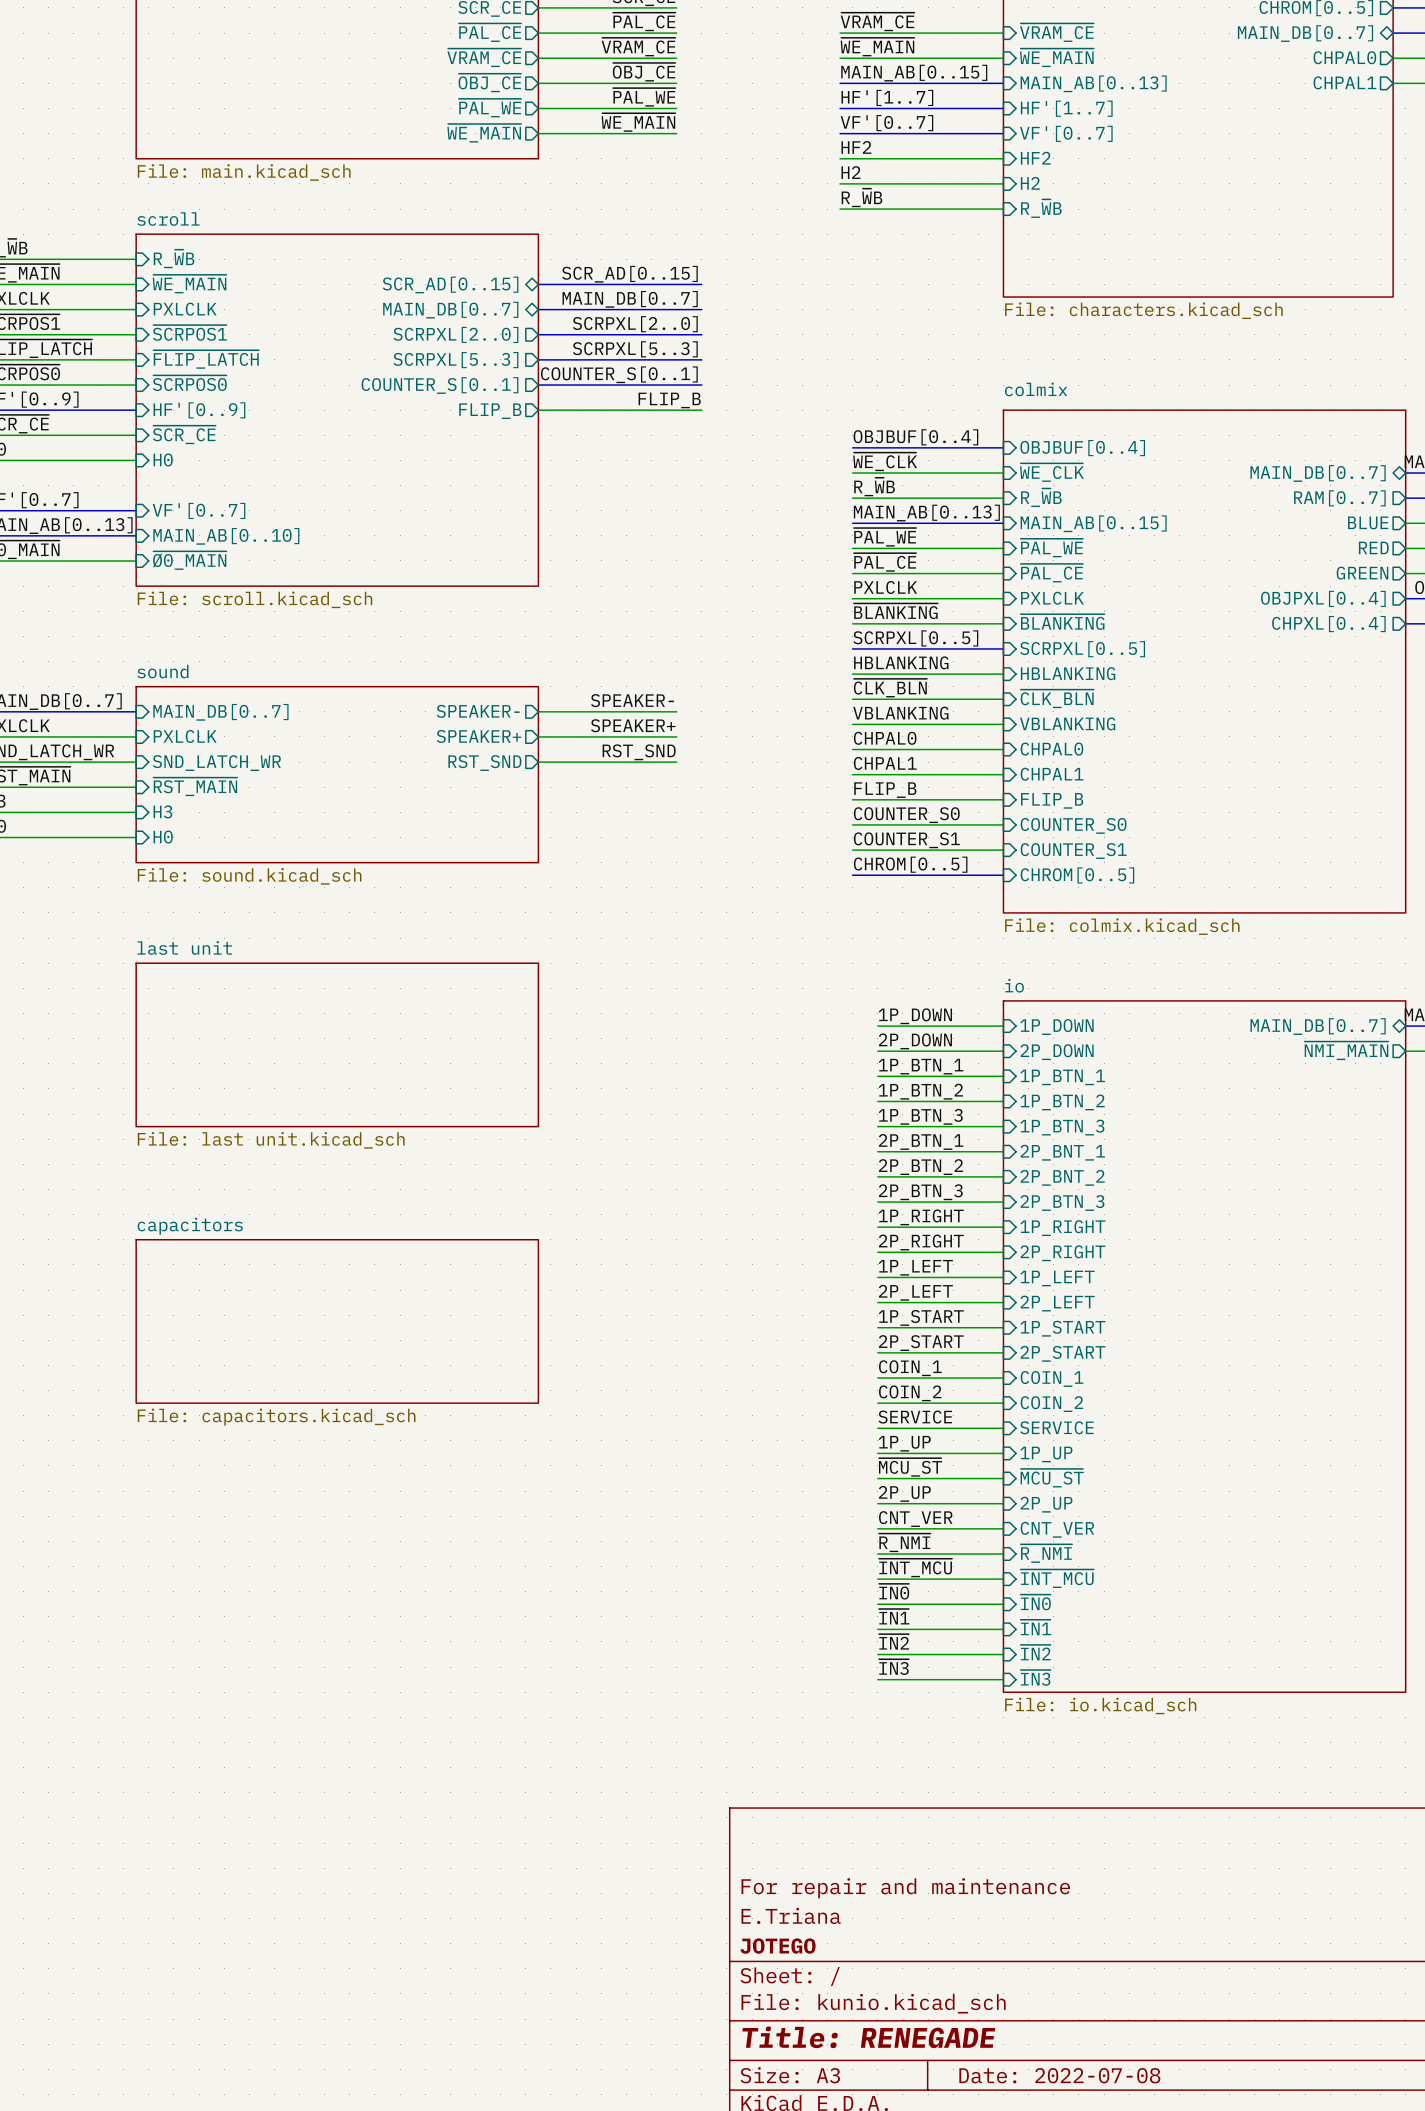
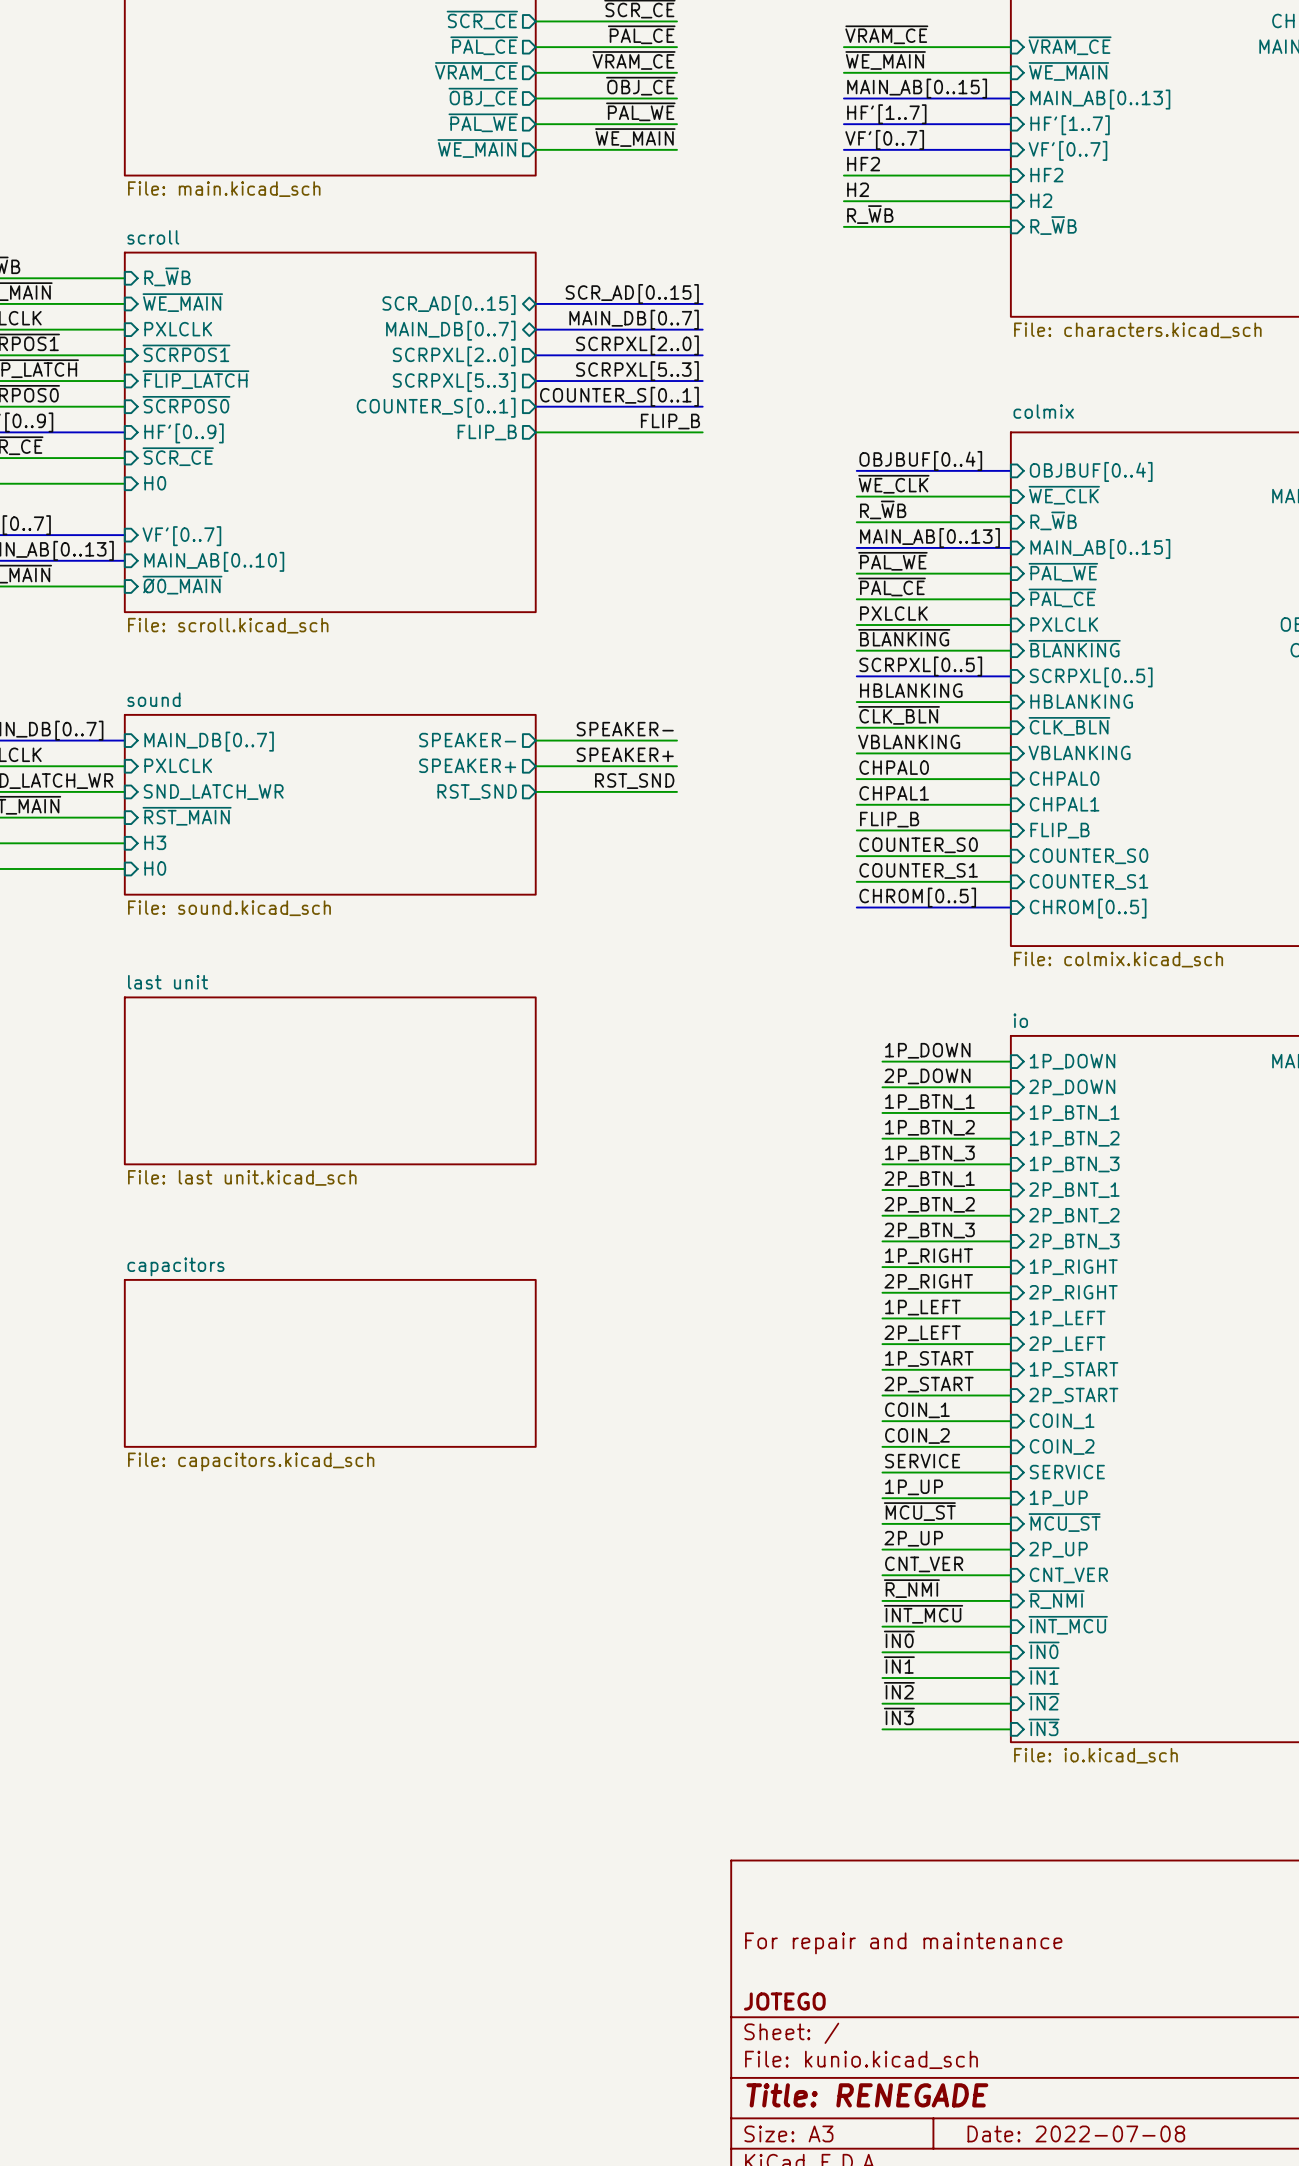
title block: E.Triana (791, 1915) -> none

